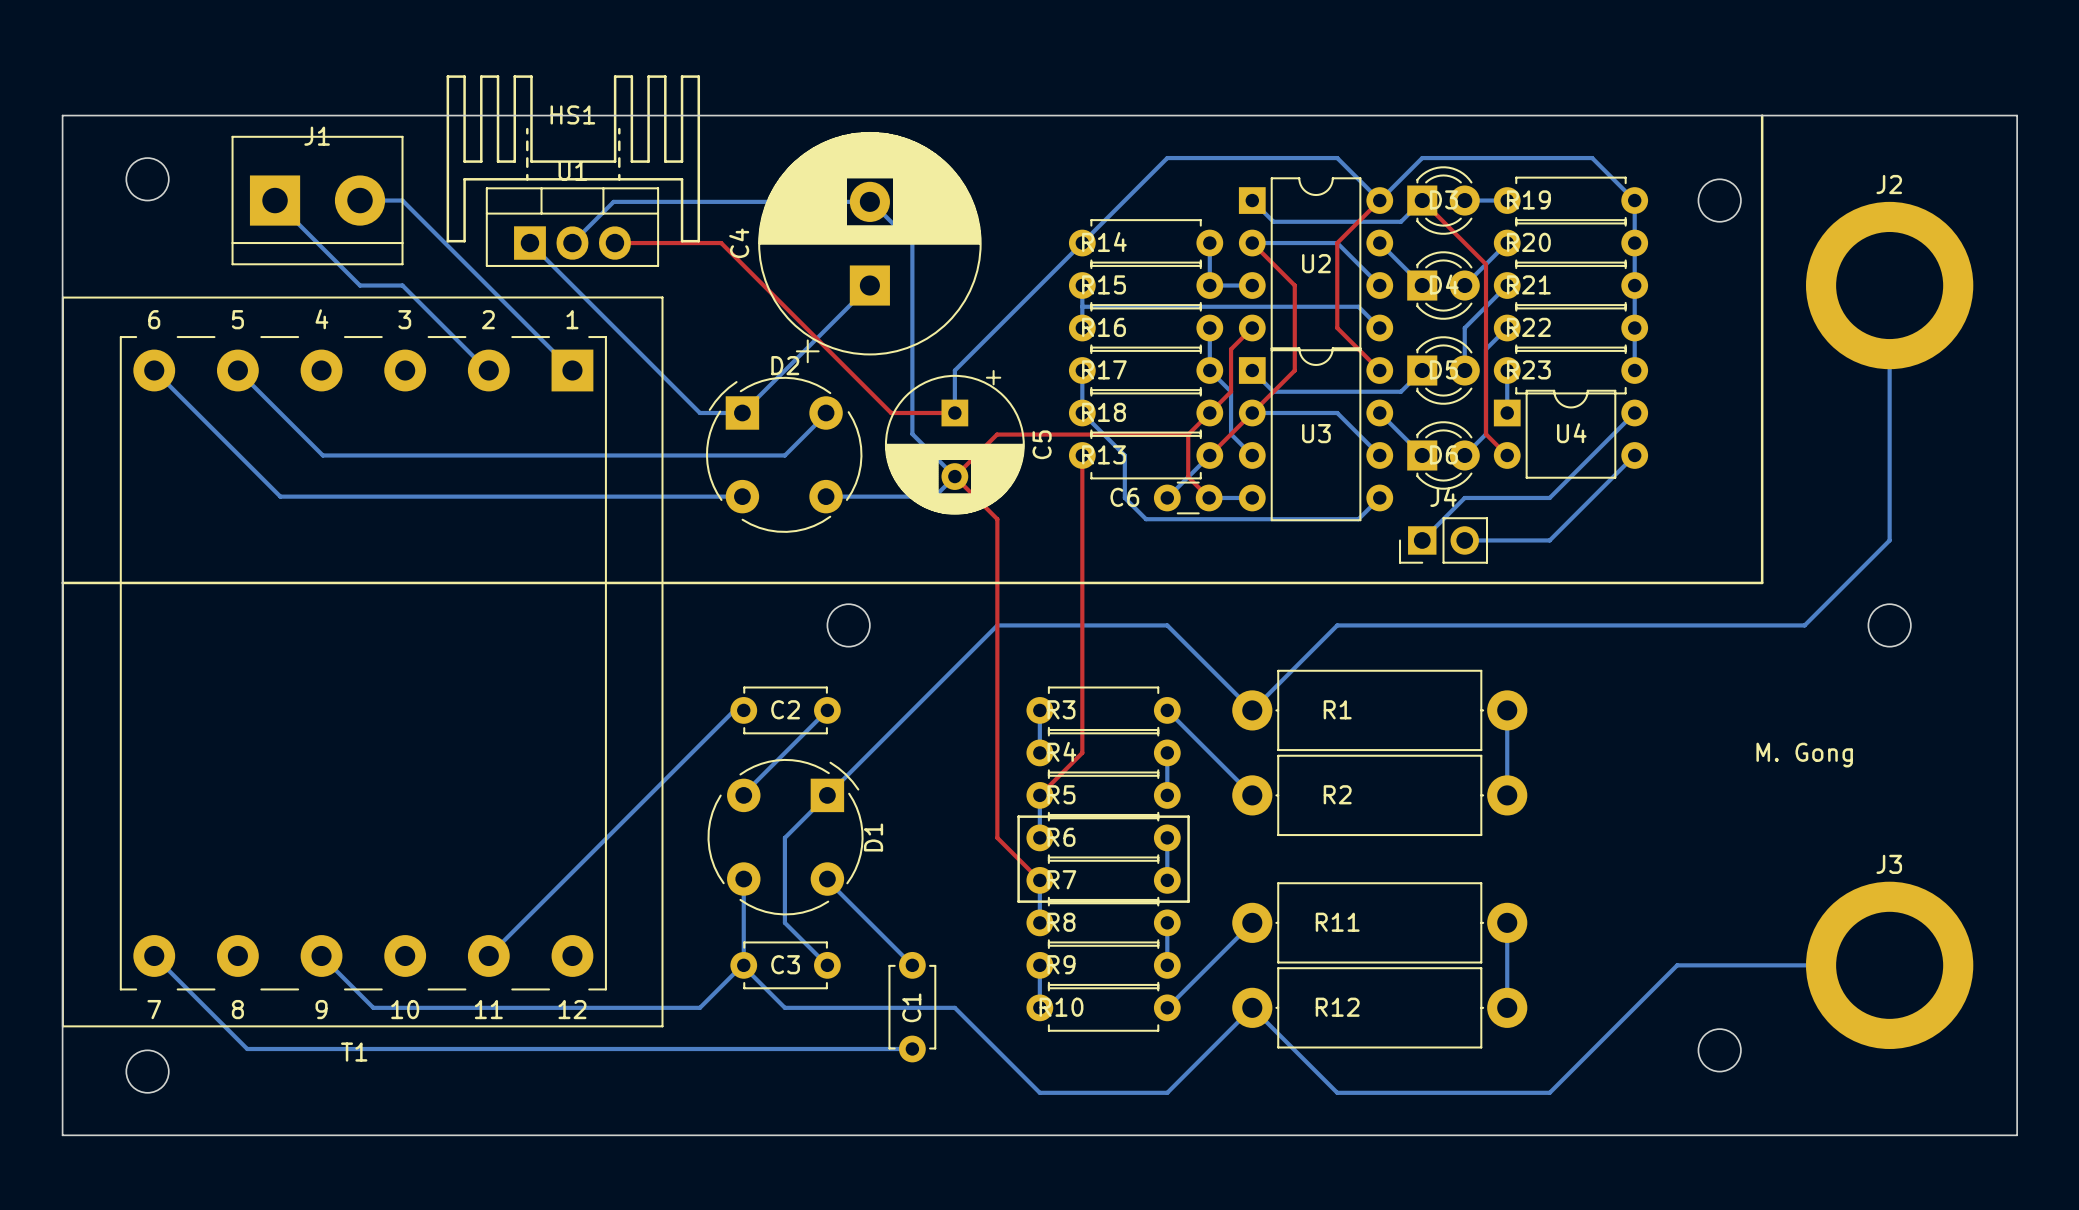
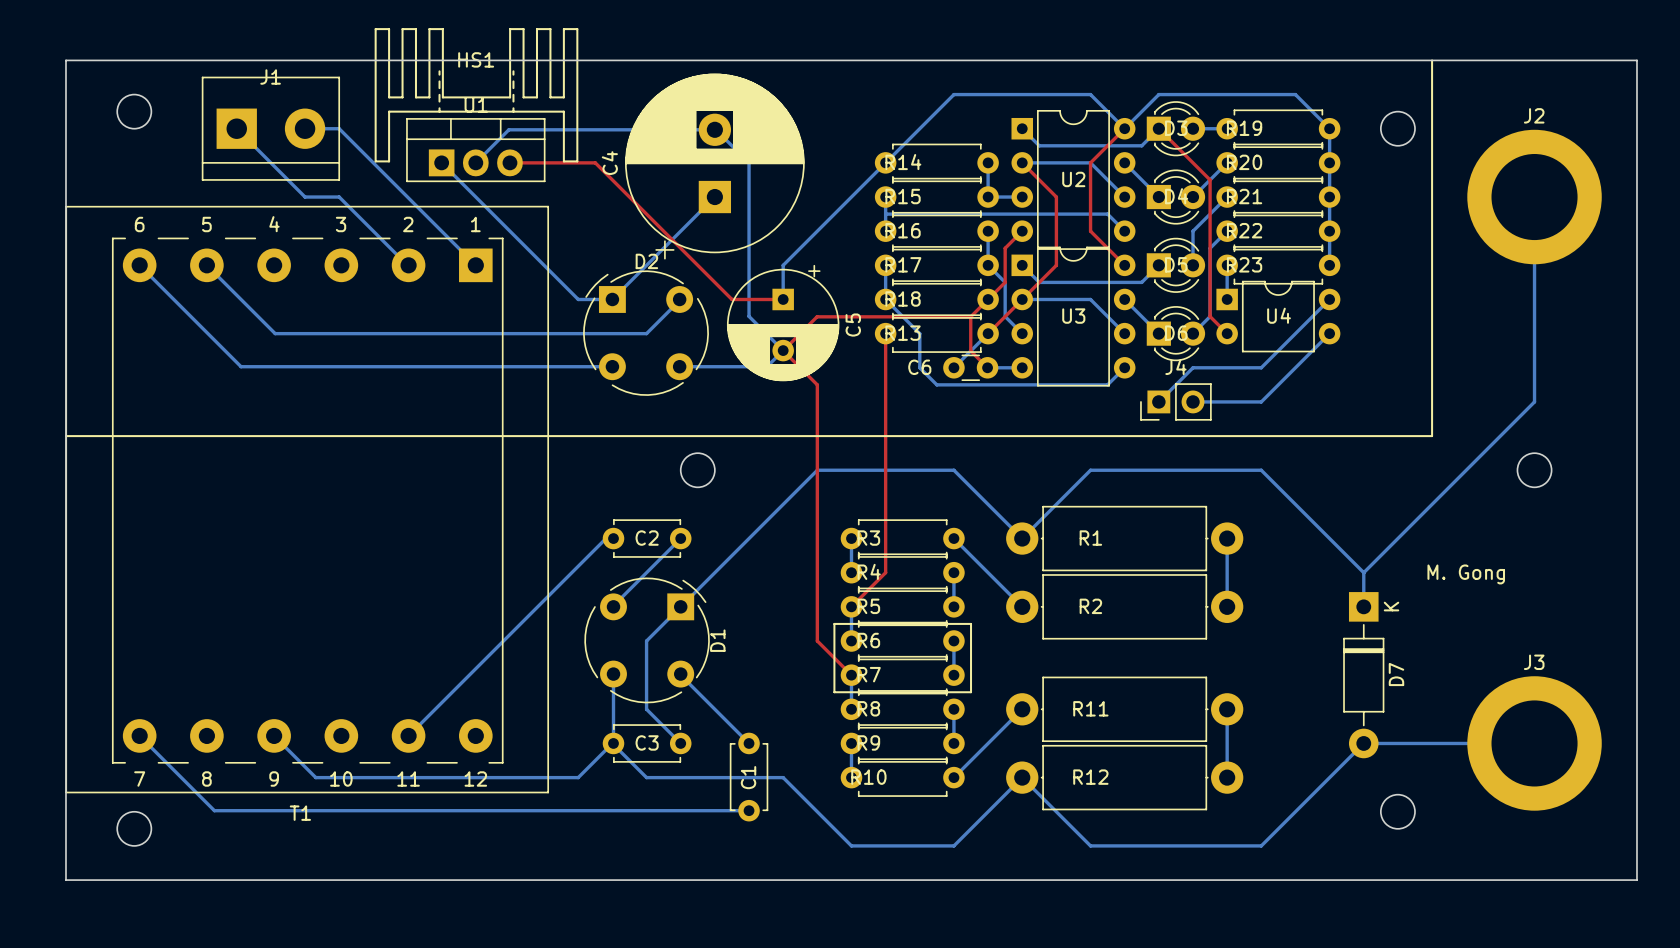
bottom track: (1549, 625) (1804, 625) -> (1261, 470) (1363, 572)
bottom track: none -> (1466, 470) (1363, 572)
bottom track: none -> (1363, 572) (1363, 606)
D7: none -> (1363, 675)

